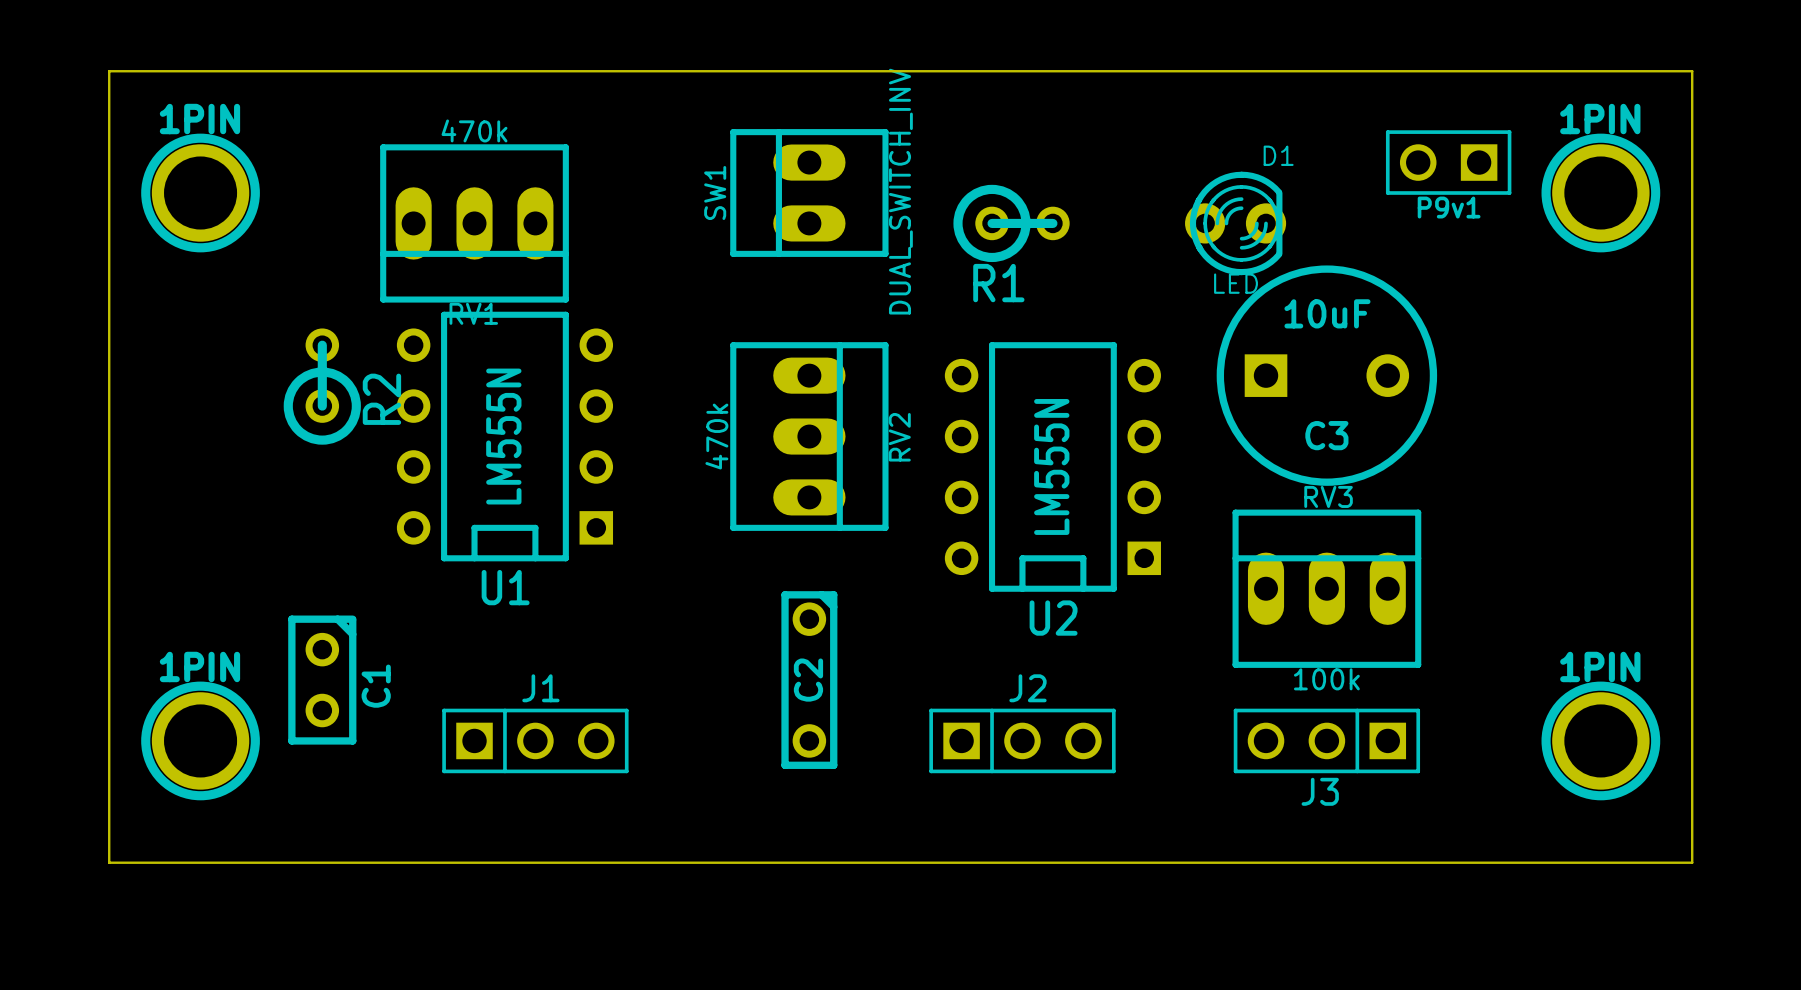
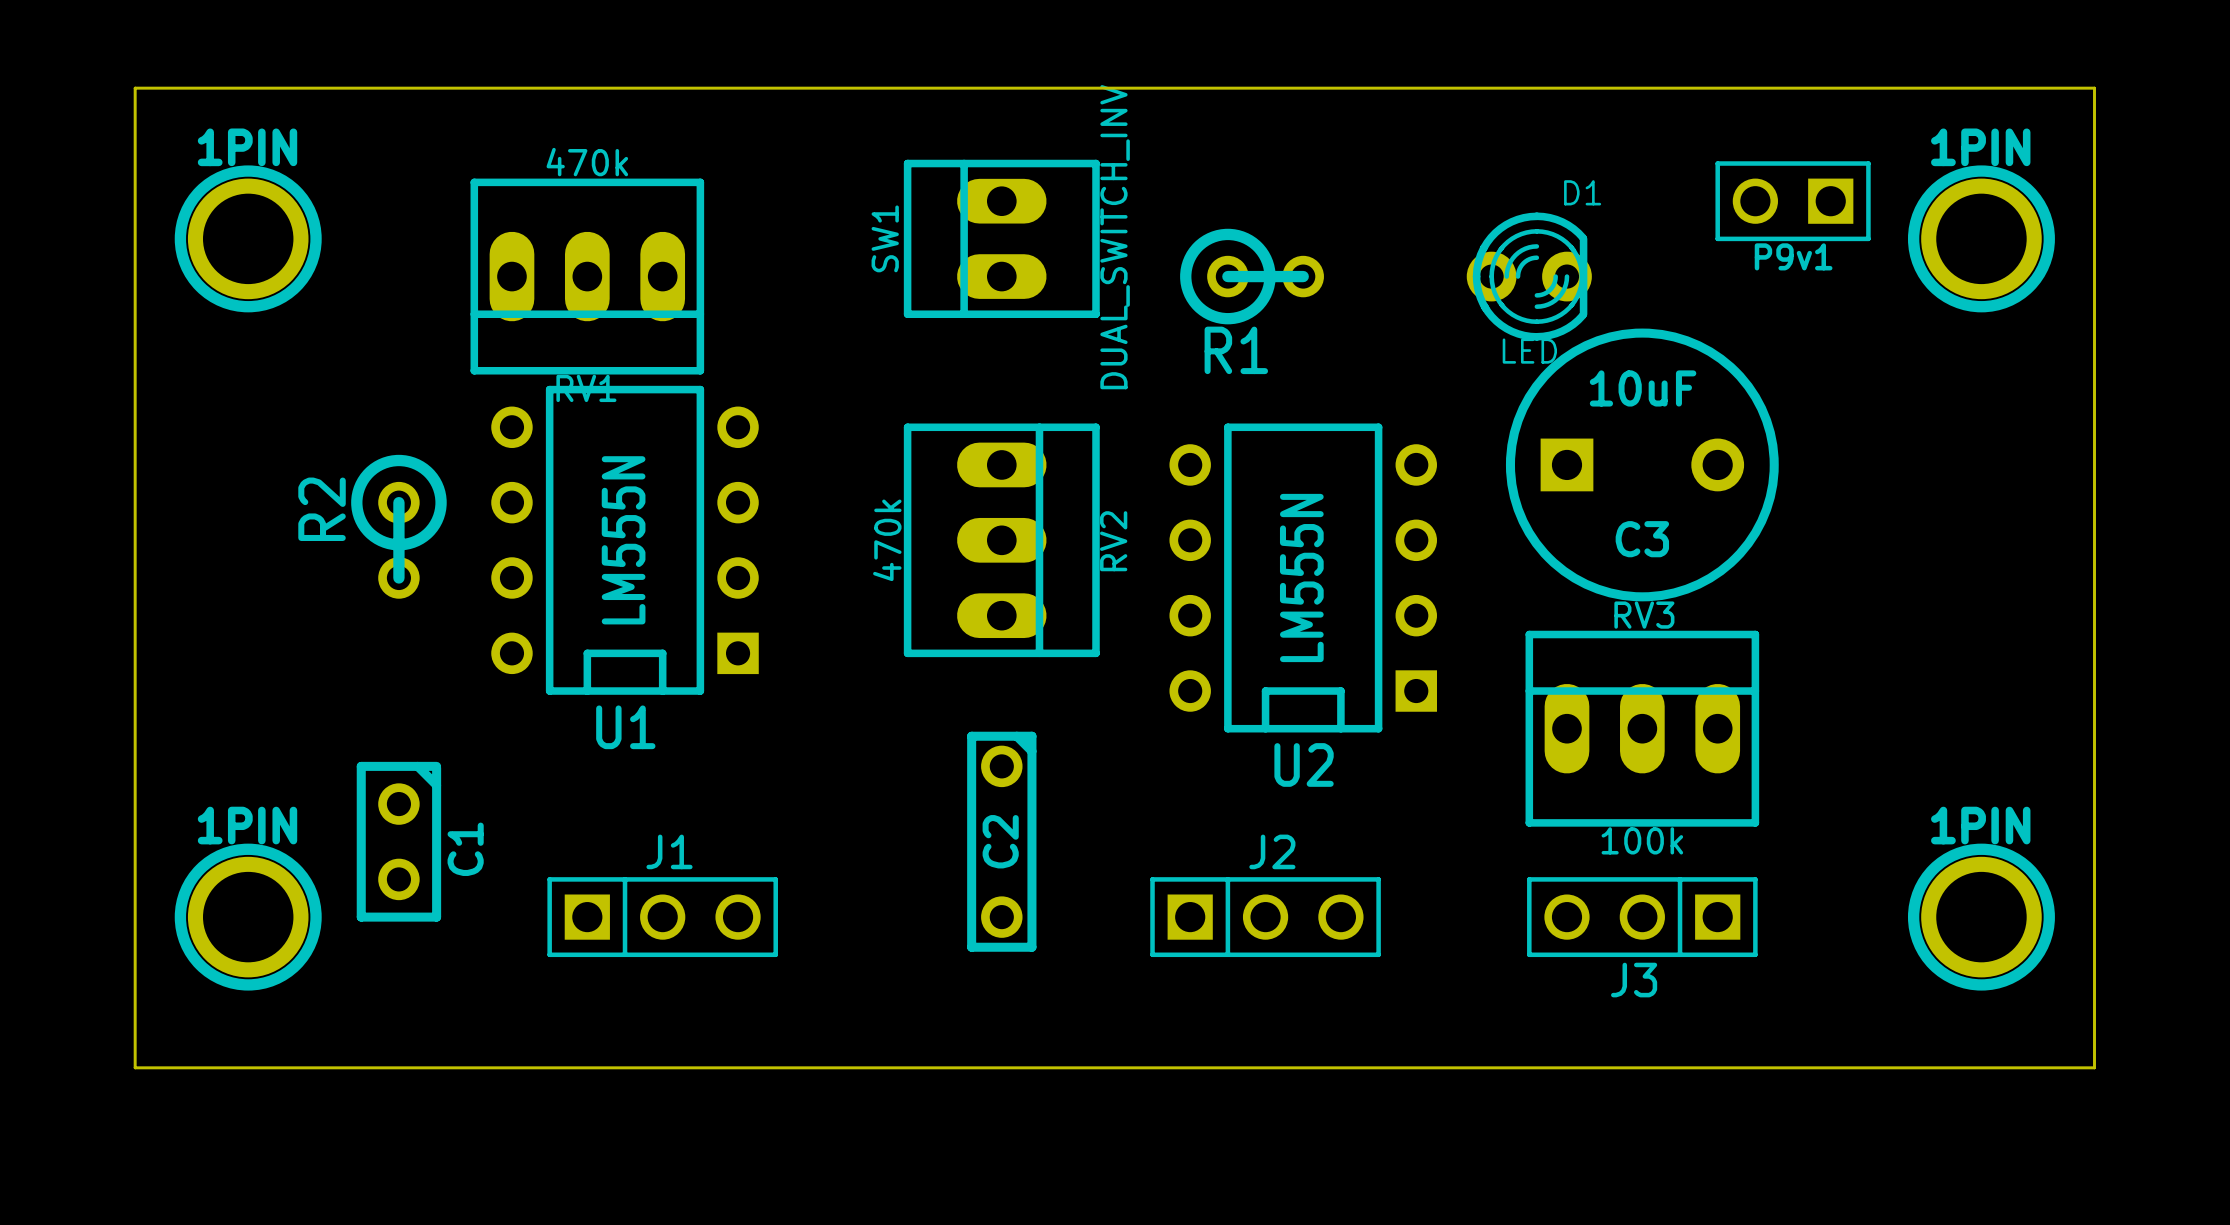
R2 rotation: 0° (322, 386) -> 180° (398, 526)

